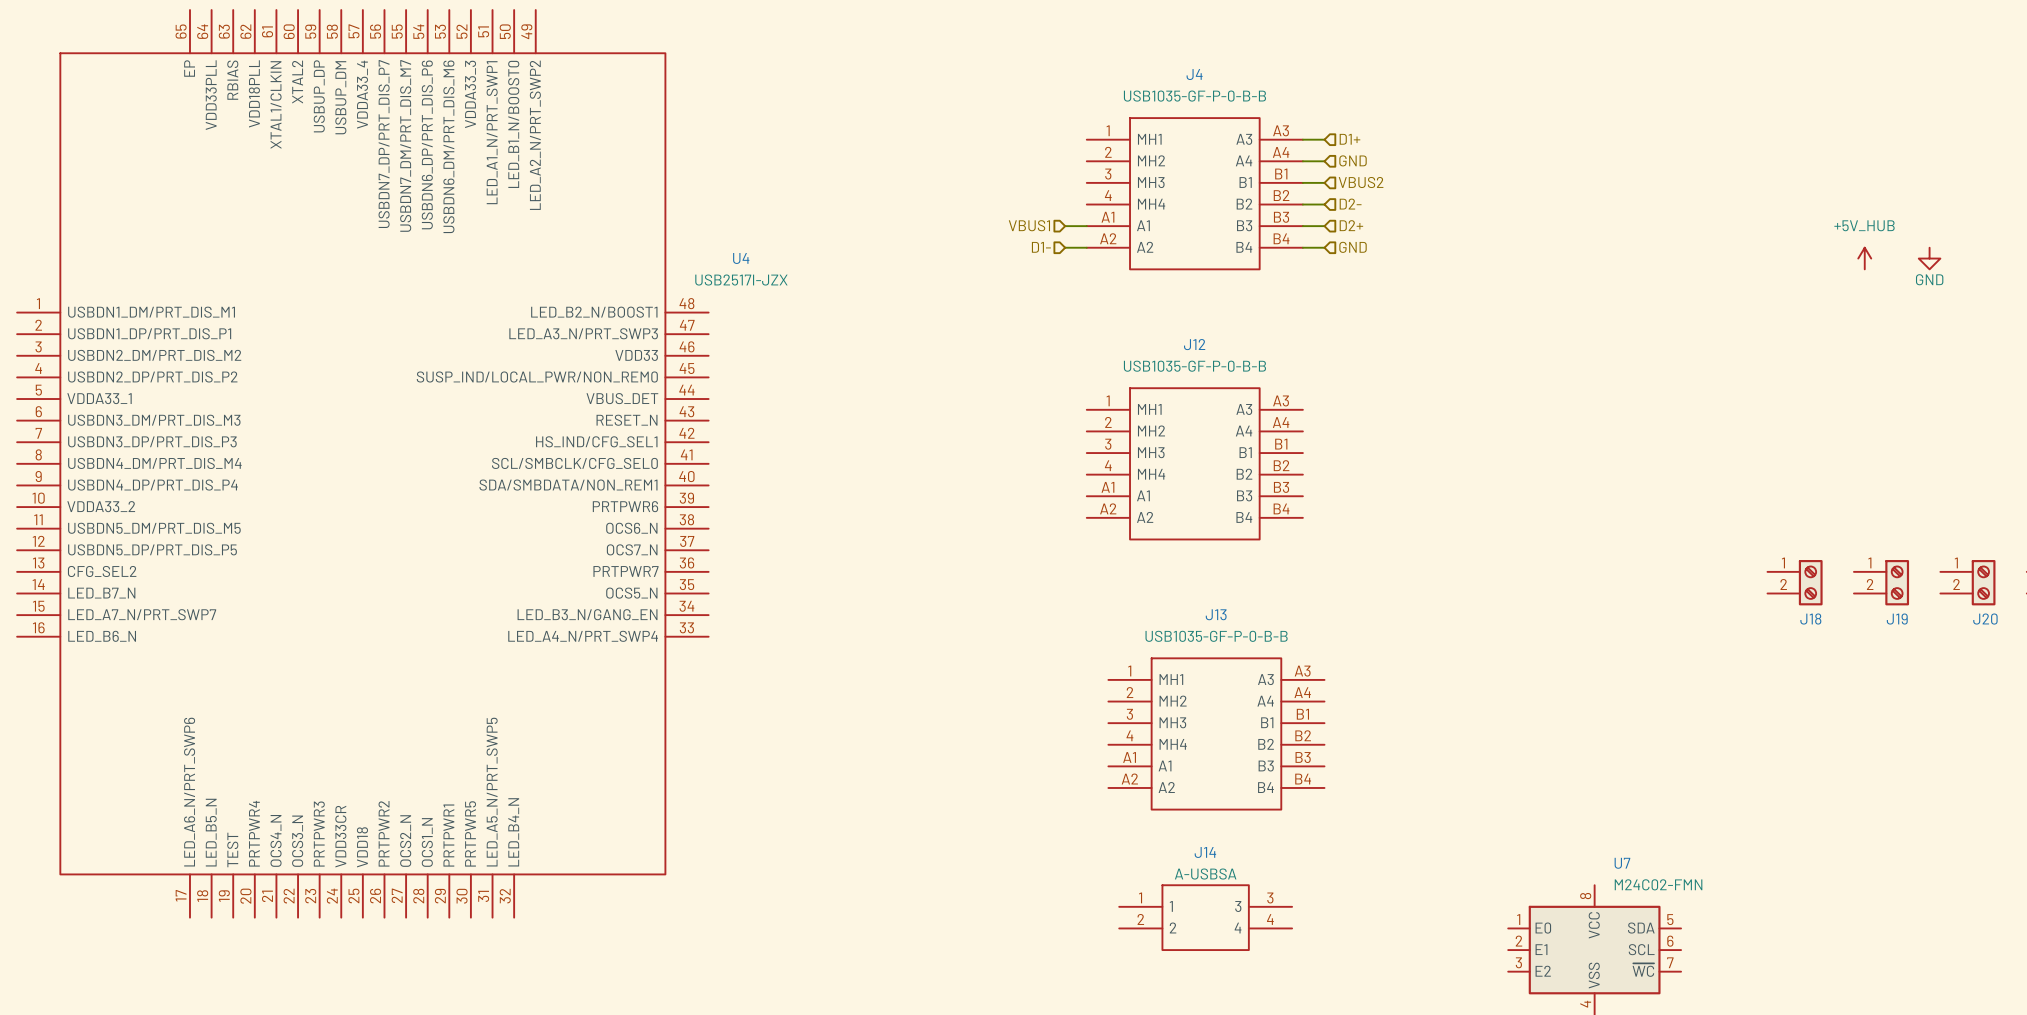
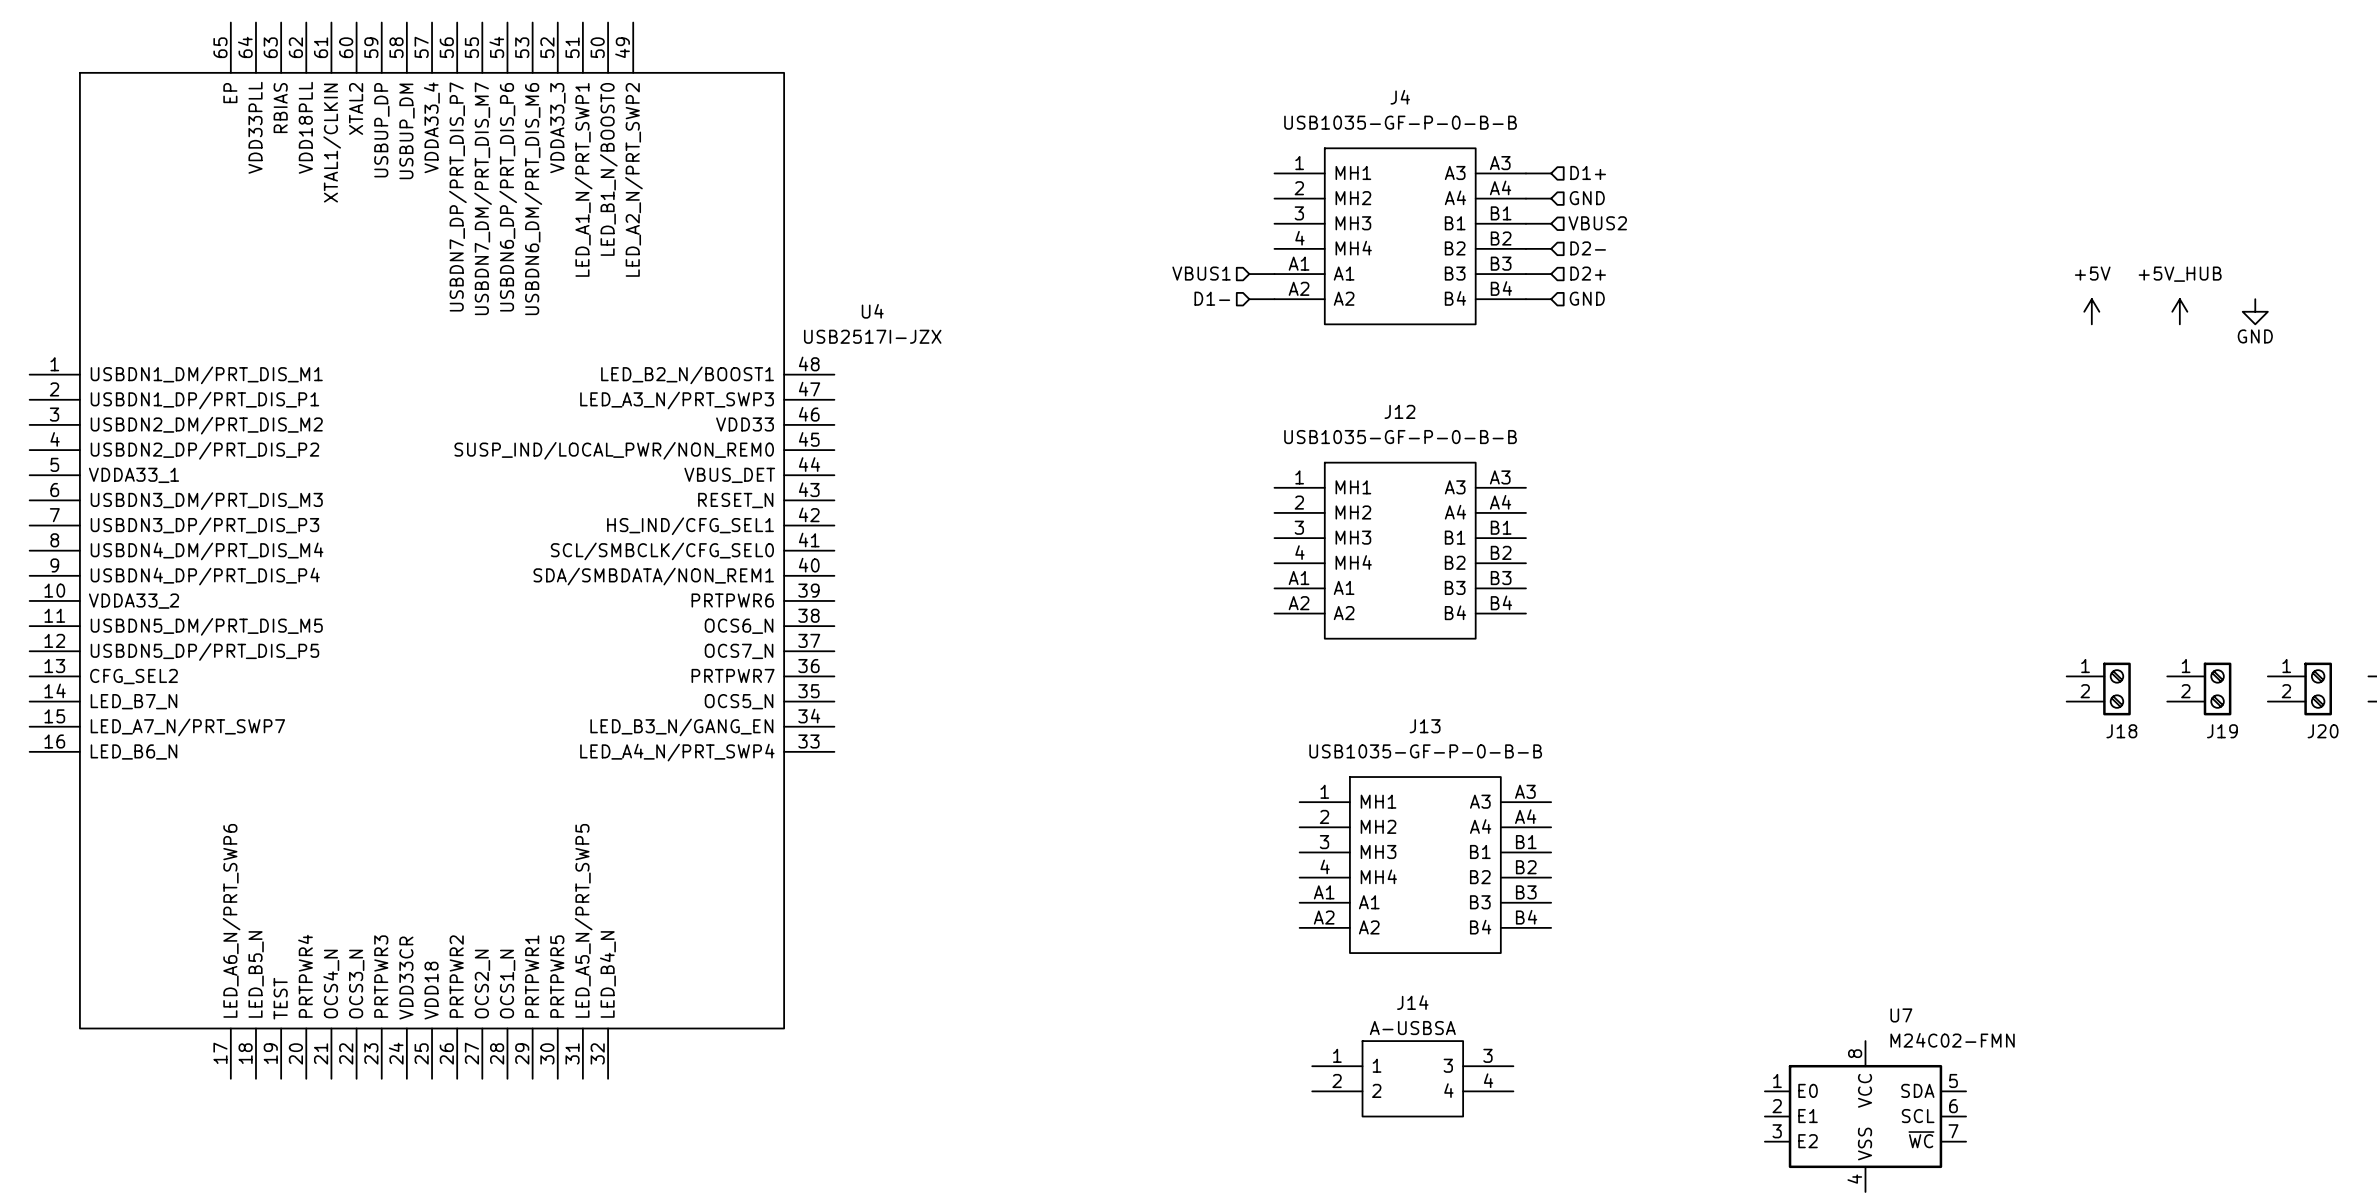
power symbol: none -> +5V (2091, 311)

